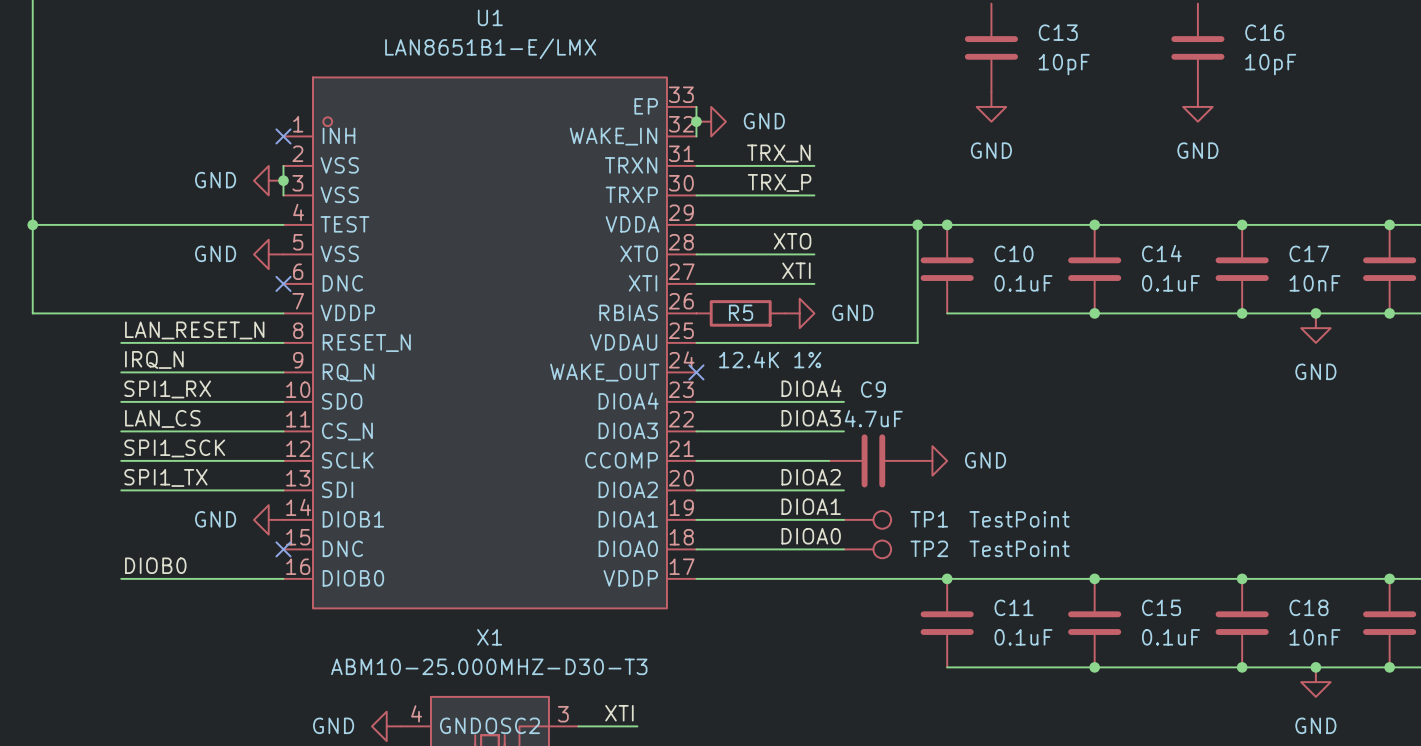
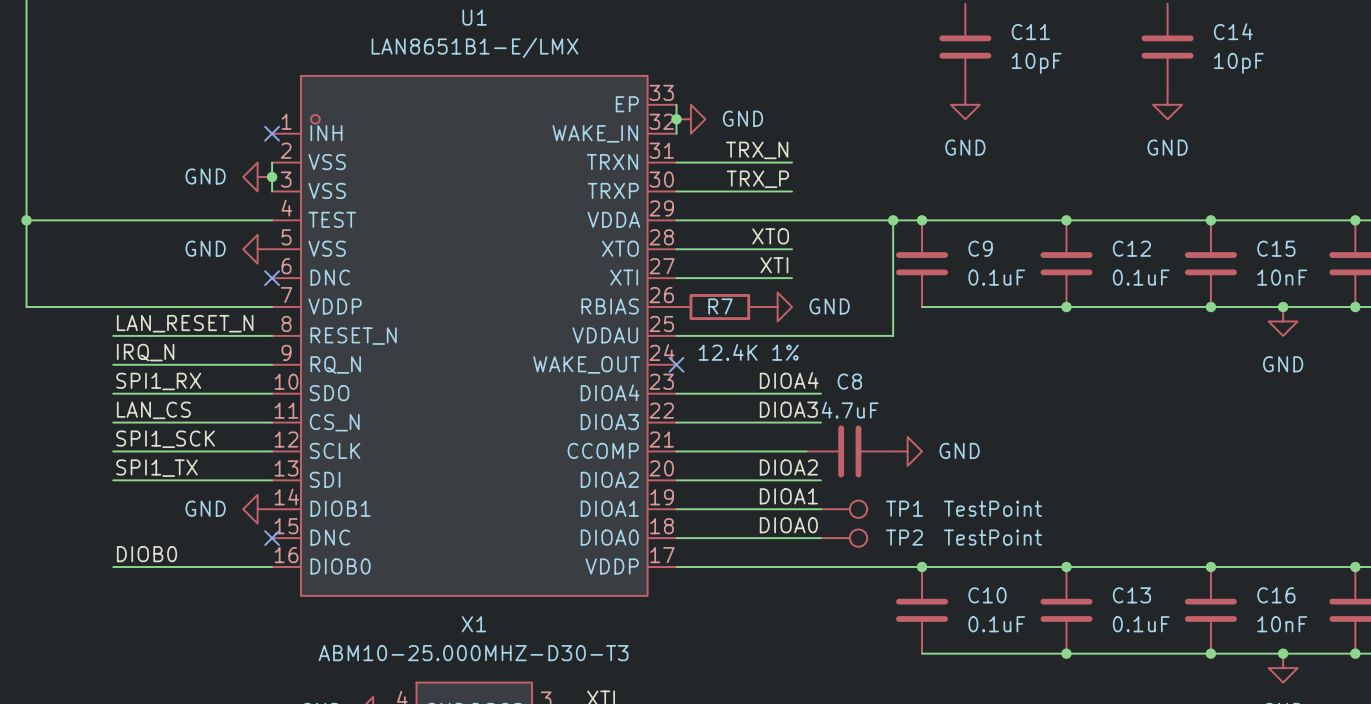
C13 name: C13 (1058, 32) -> C11 (1030, 32)
C16 name: C16 (1264, 32) -> C14 (1233, 31)
C10 name: C10 (1014, 253) -> C9 (980, 248)
C14 name: C14 (1161, 253) -> C12 (1131, 248)
C17 name: C17 (1309, 253) -> C15 (1276, 248)
R5 name: R5 (741, 312) -> R7 (720, 306)
C9 name: C9 (873, 389) -> C8 (849, 381)
C11 name: C11 (1014, 607) -> C10 (987, 595)
C15 name: C15 (1161, 607) -> C13 (1131, 595)
C18 name: C18 (1308, 607) -> C16 (1276, 595)

